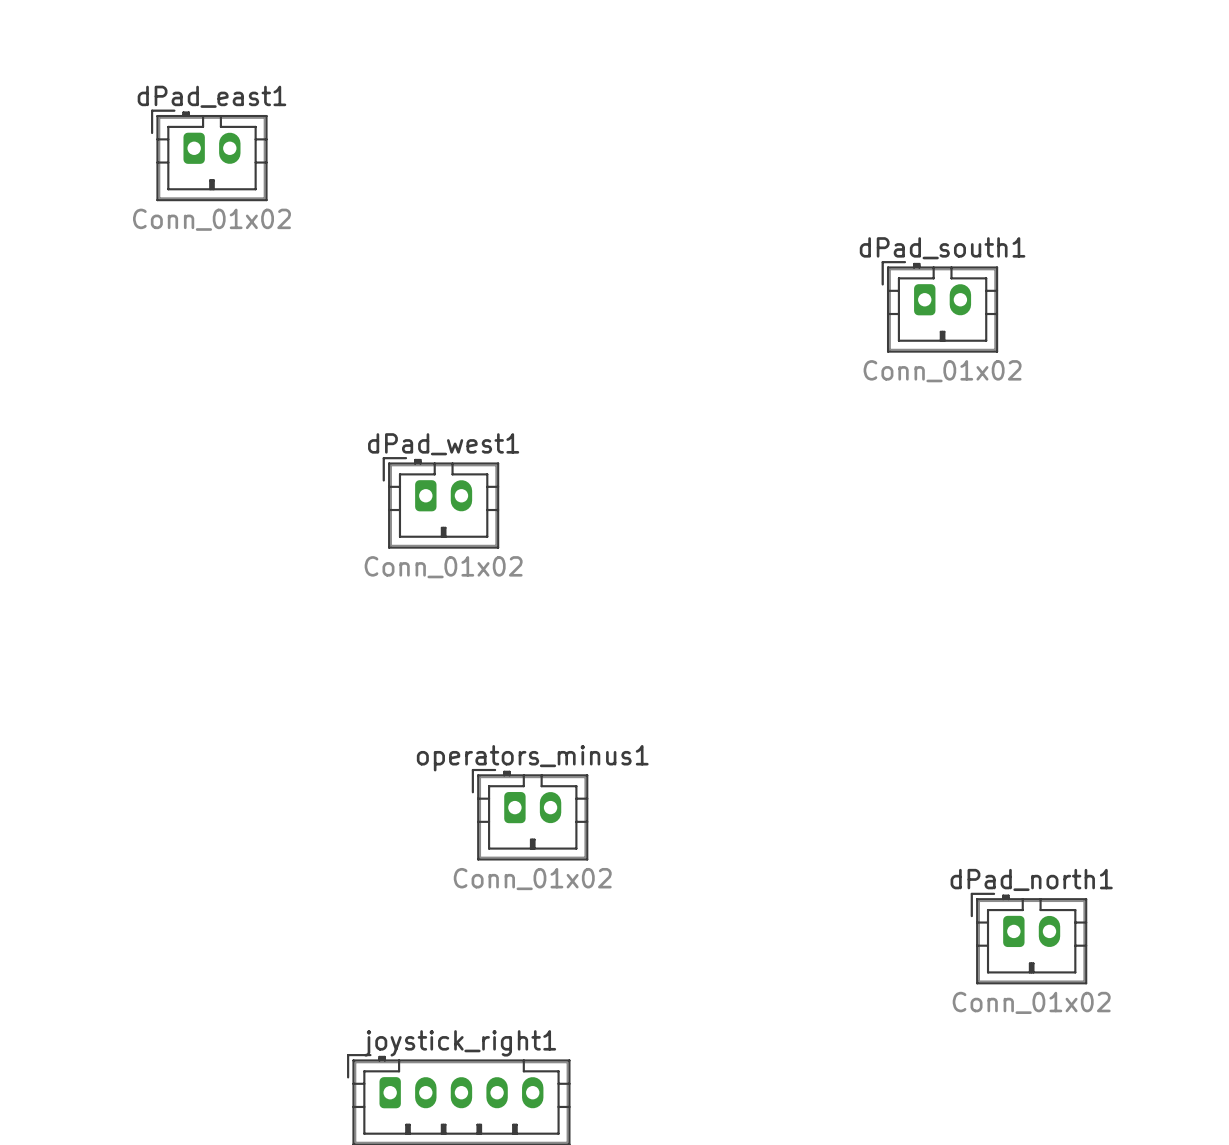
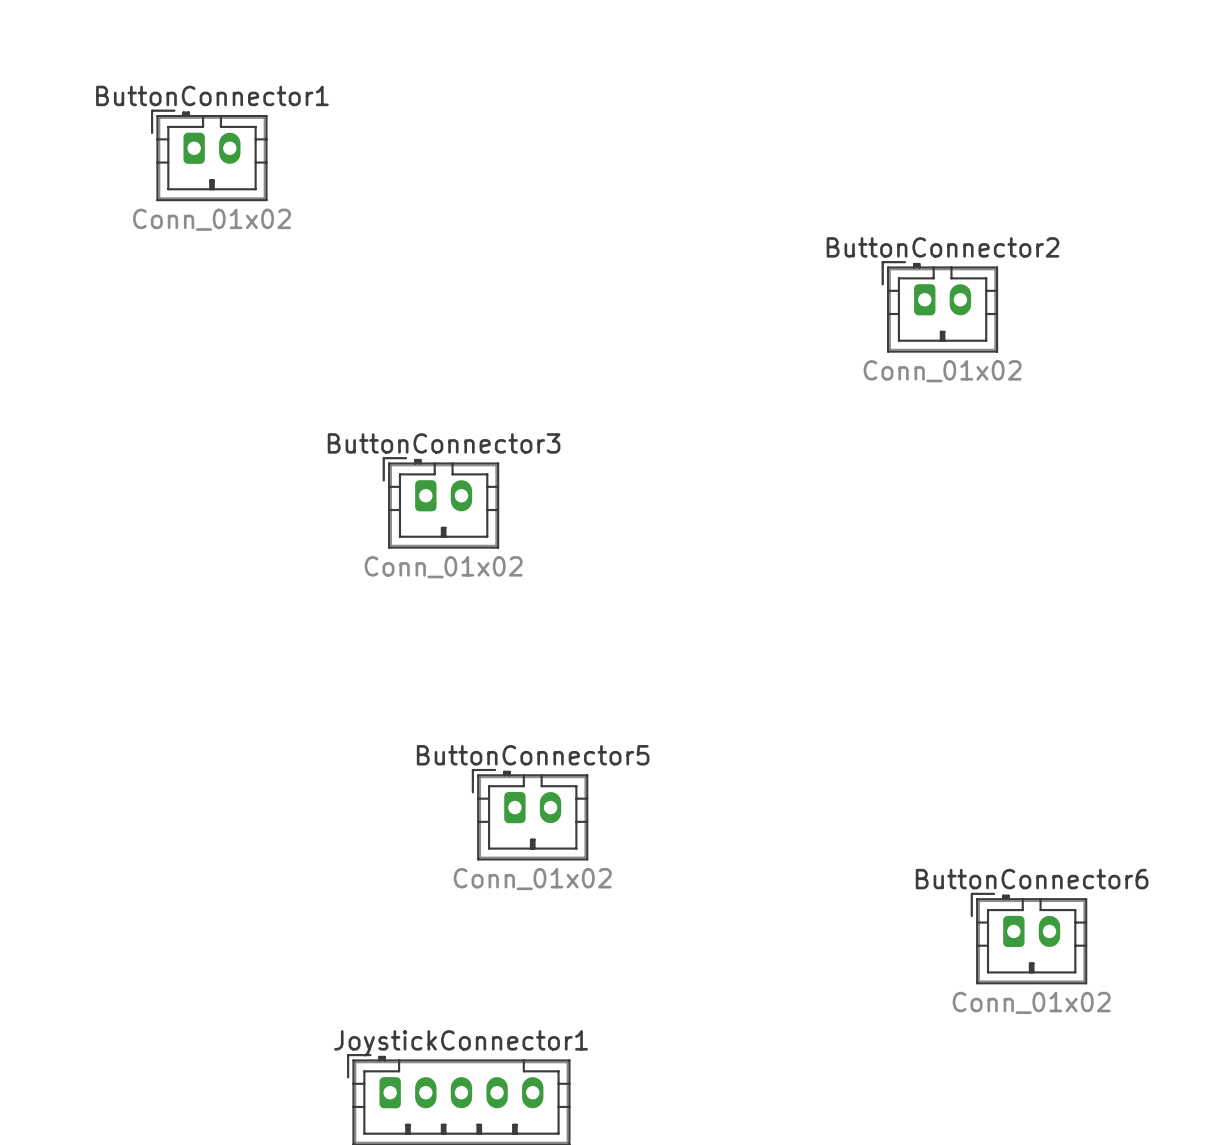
dPad_east1 name: dPad_east1 (211, 96) -> ButtonConnector1 (212, 95)
dPad_south1 name: dPad_south1 (942, 248) -> ButtonConnector2 (943, 247)
dPad_west1 name: dPad_west1 (443, 444) -> ButtonConnector3 (444, 443)
operators_minus1 name: operators_minus1 (532, 758) -> ButtonConnector5 (533, 755)
dPad_north1 name: dPad_north1 (1031, 879) -> ButtonConnector6 (1032, 879)
joystick_right1 name: joystick_right1 (460, 1043) -> JoystickConnector1 (461, 1043)

